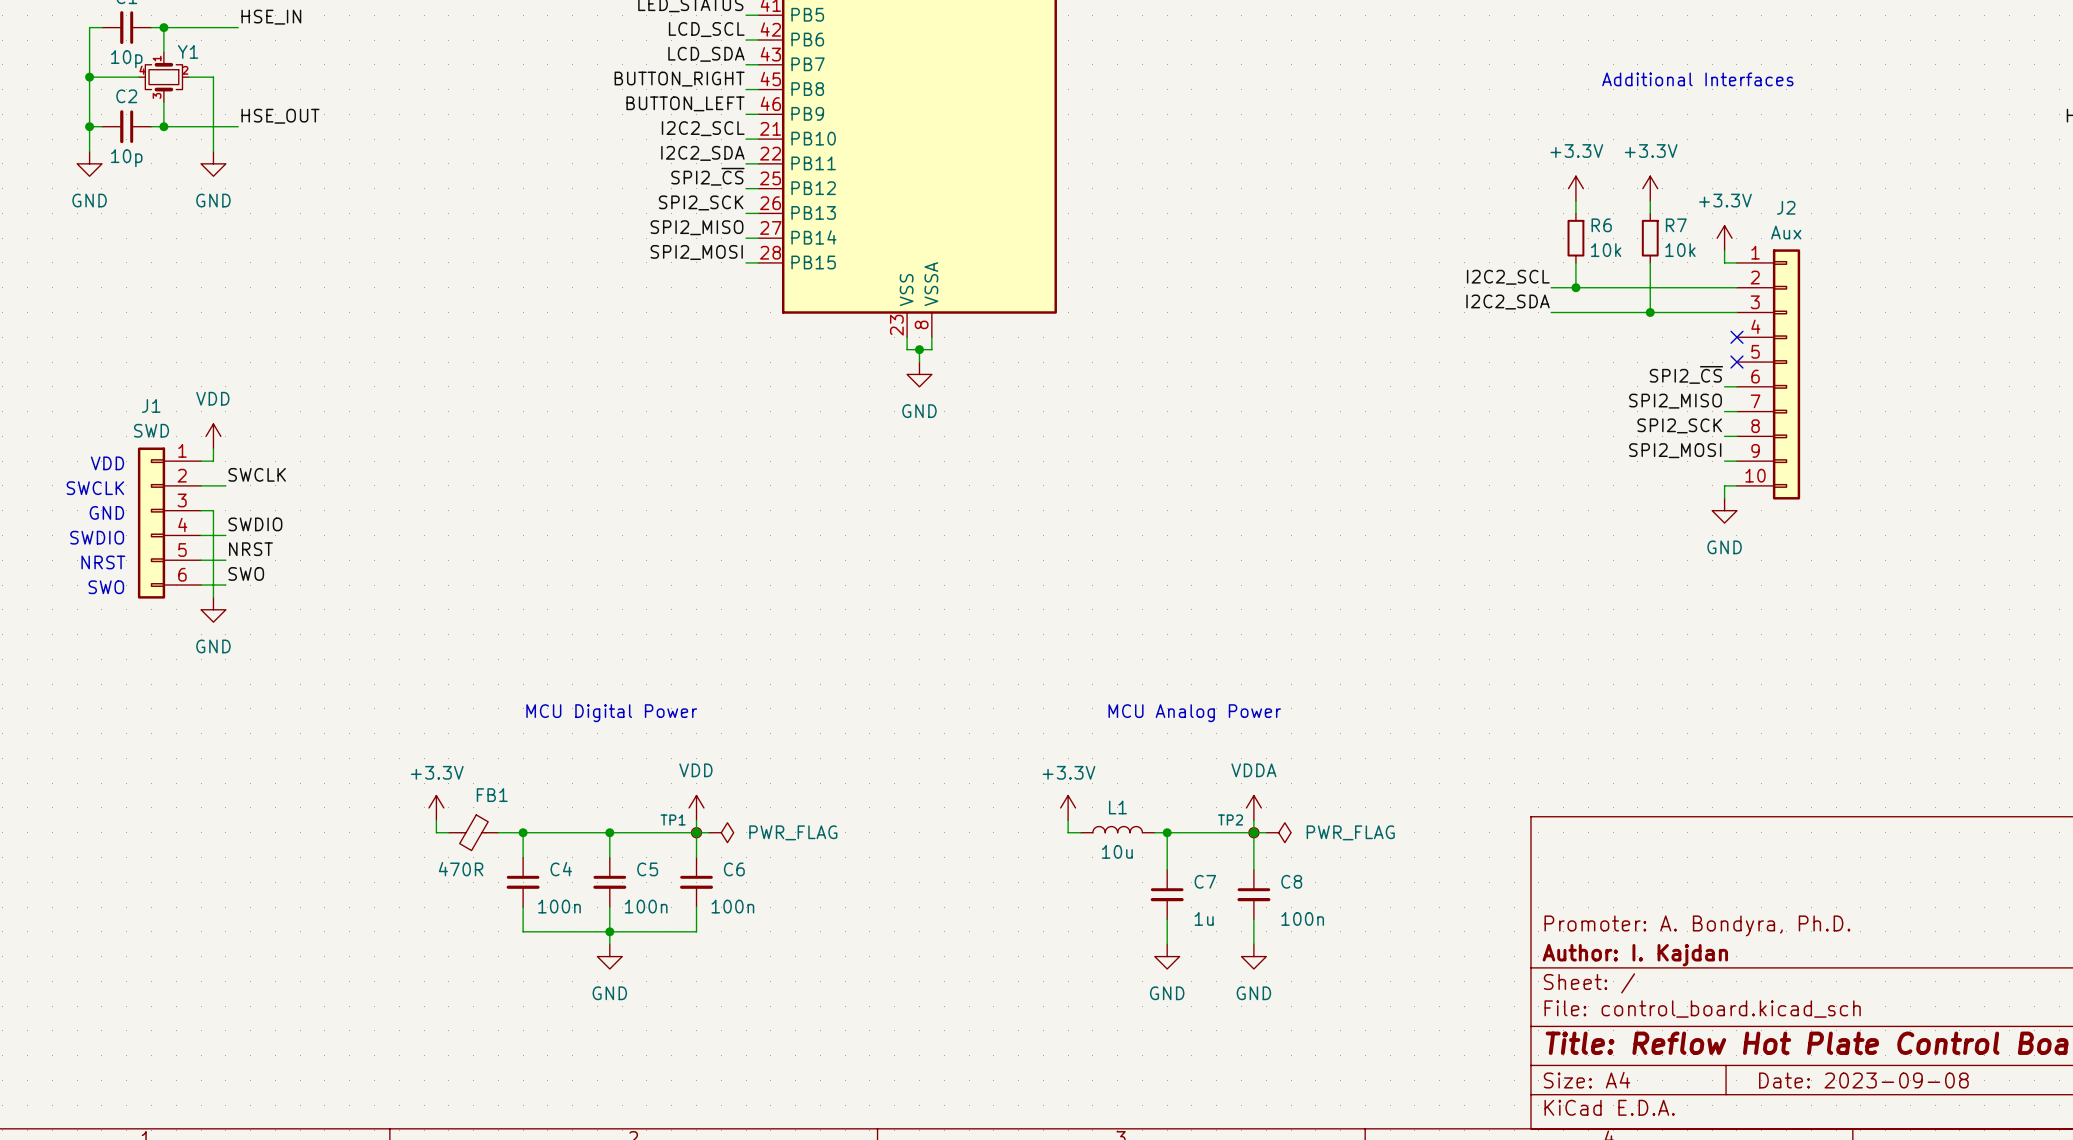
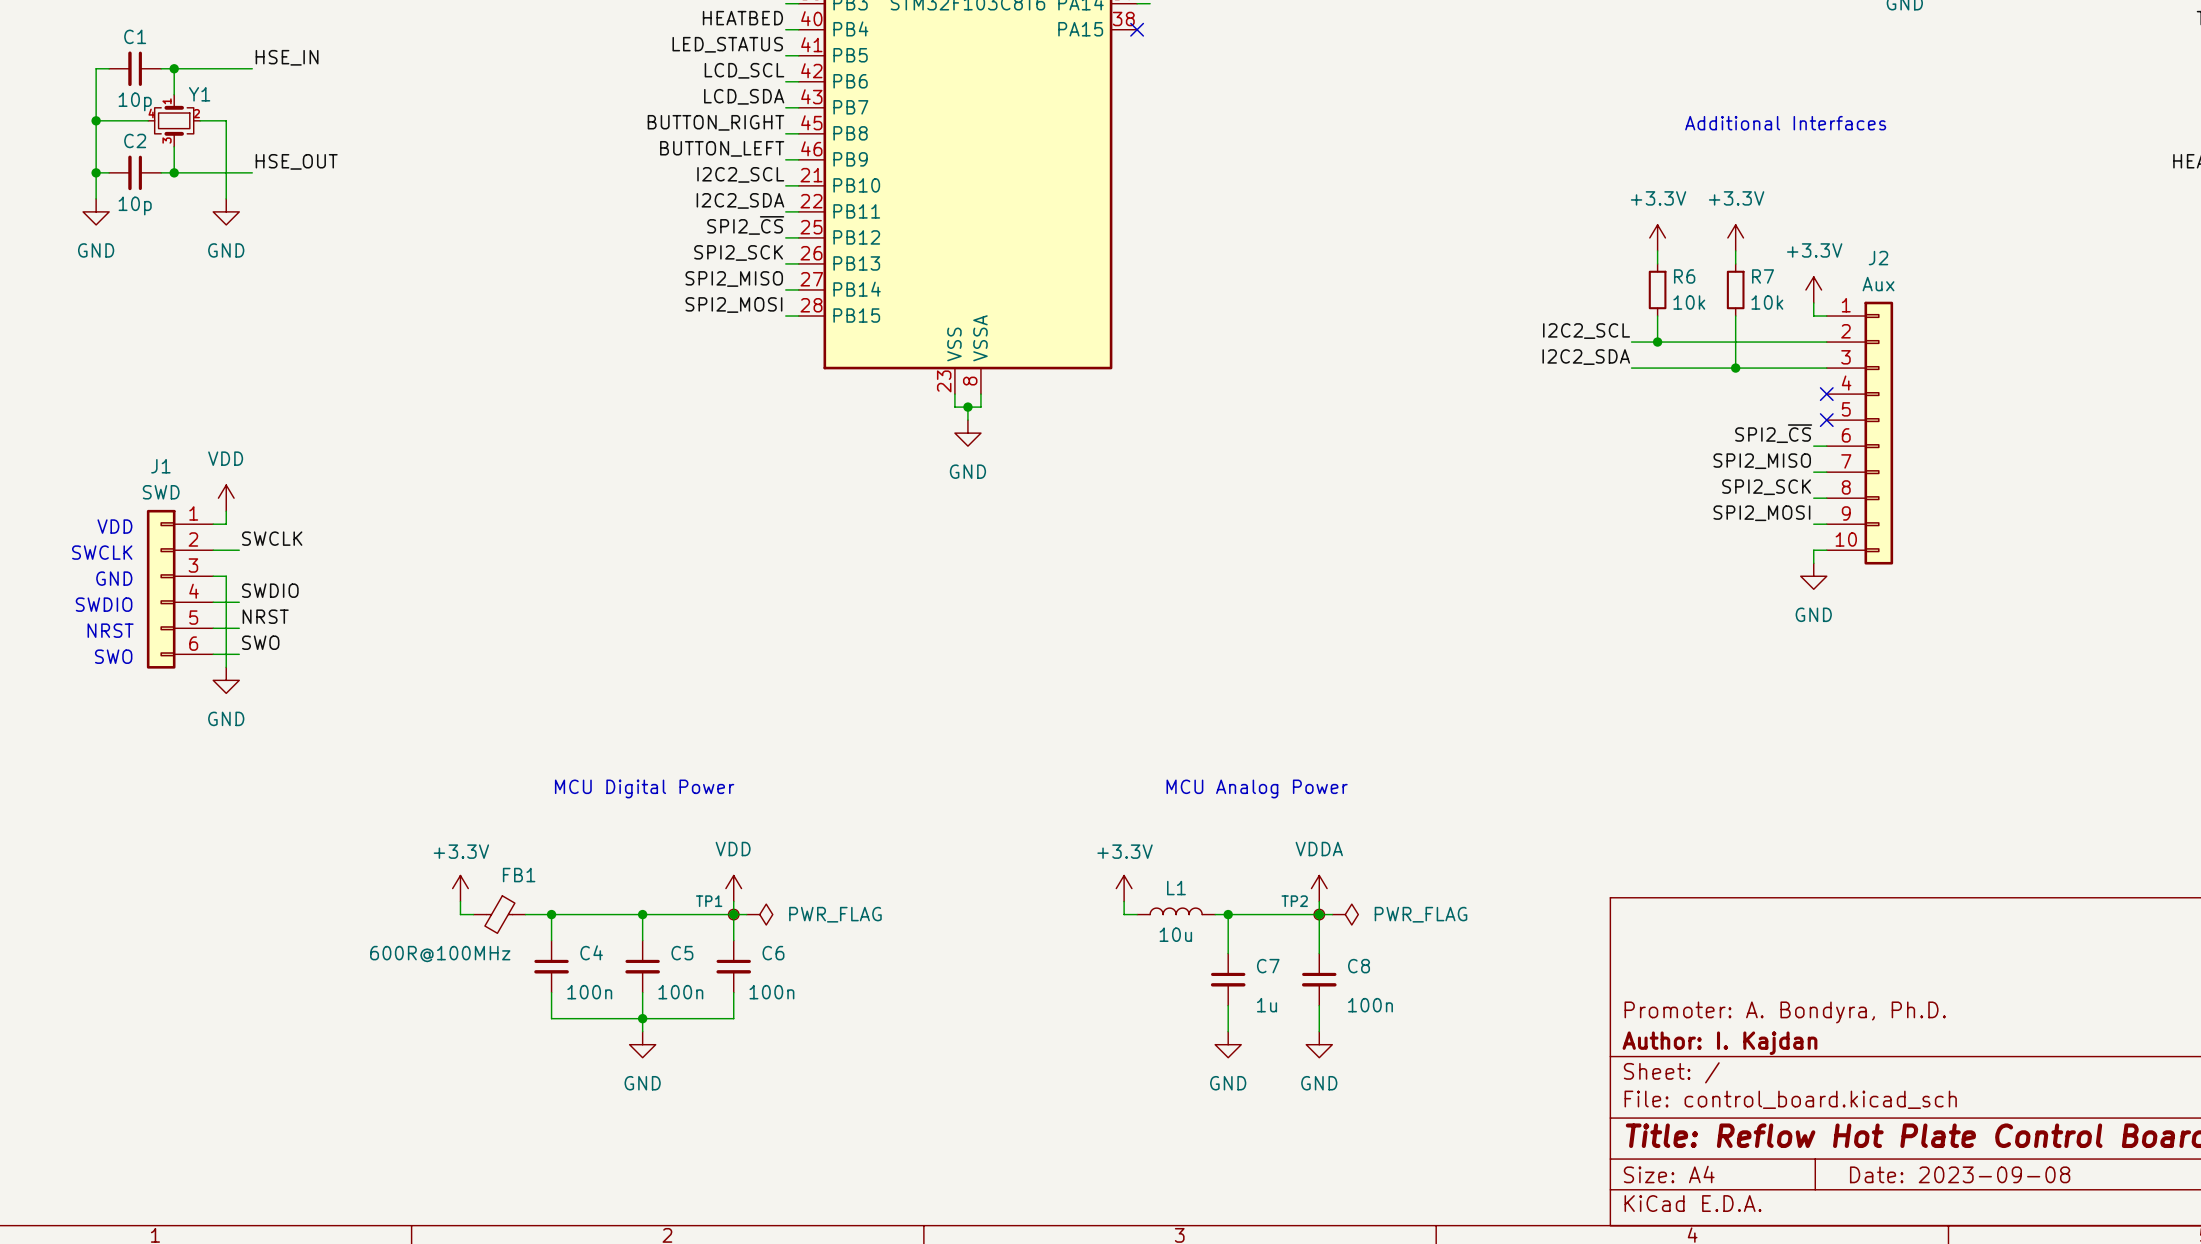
FB1 value: 470R (461, 869) -> 600R@100MHz (440, 954)

